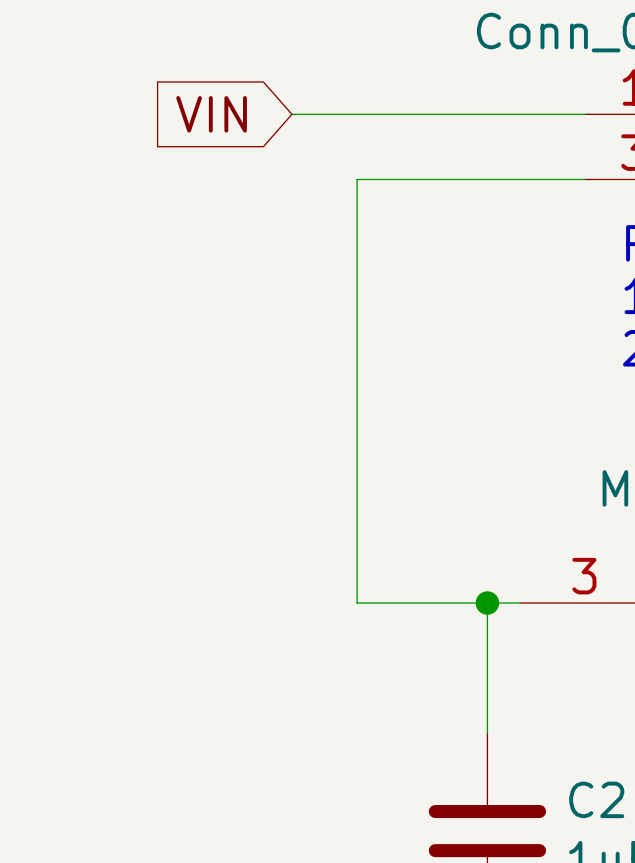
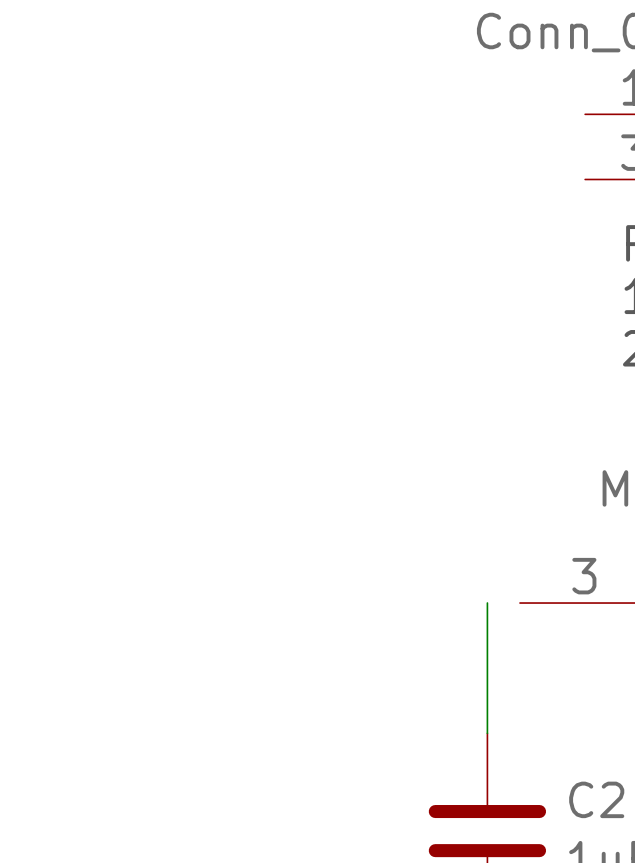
global label: VIN (211, 114) -> none
wire: (291, 114) (585, 114) -> none
wire: (585, 179) (357, 179) (357, 603) (519, 603) -> none
junction: (487, 603) -> none

